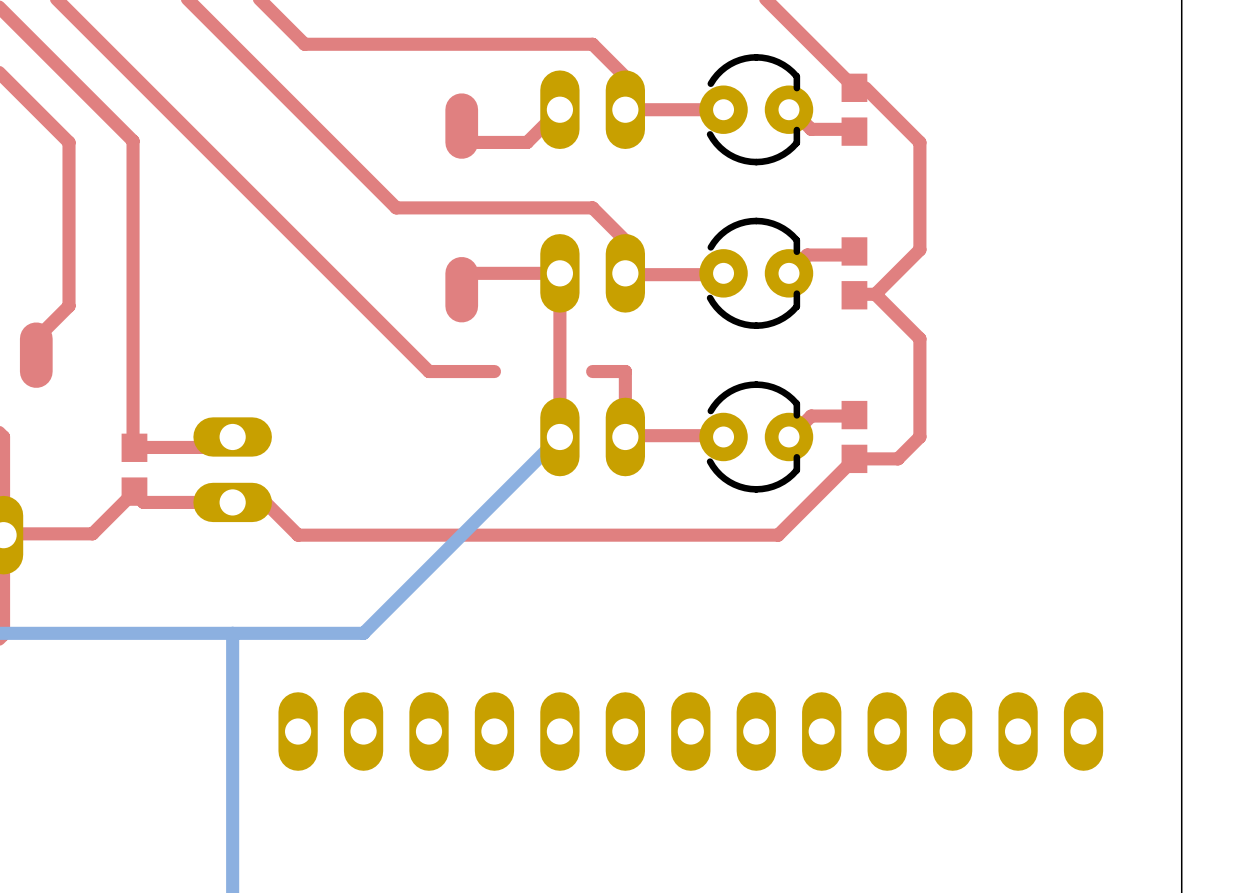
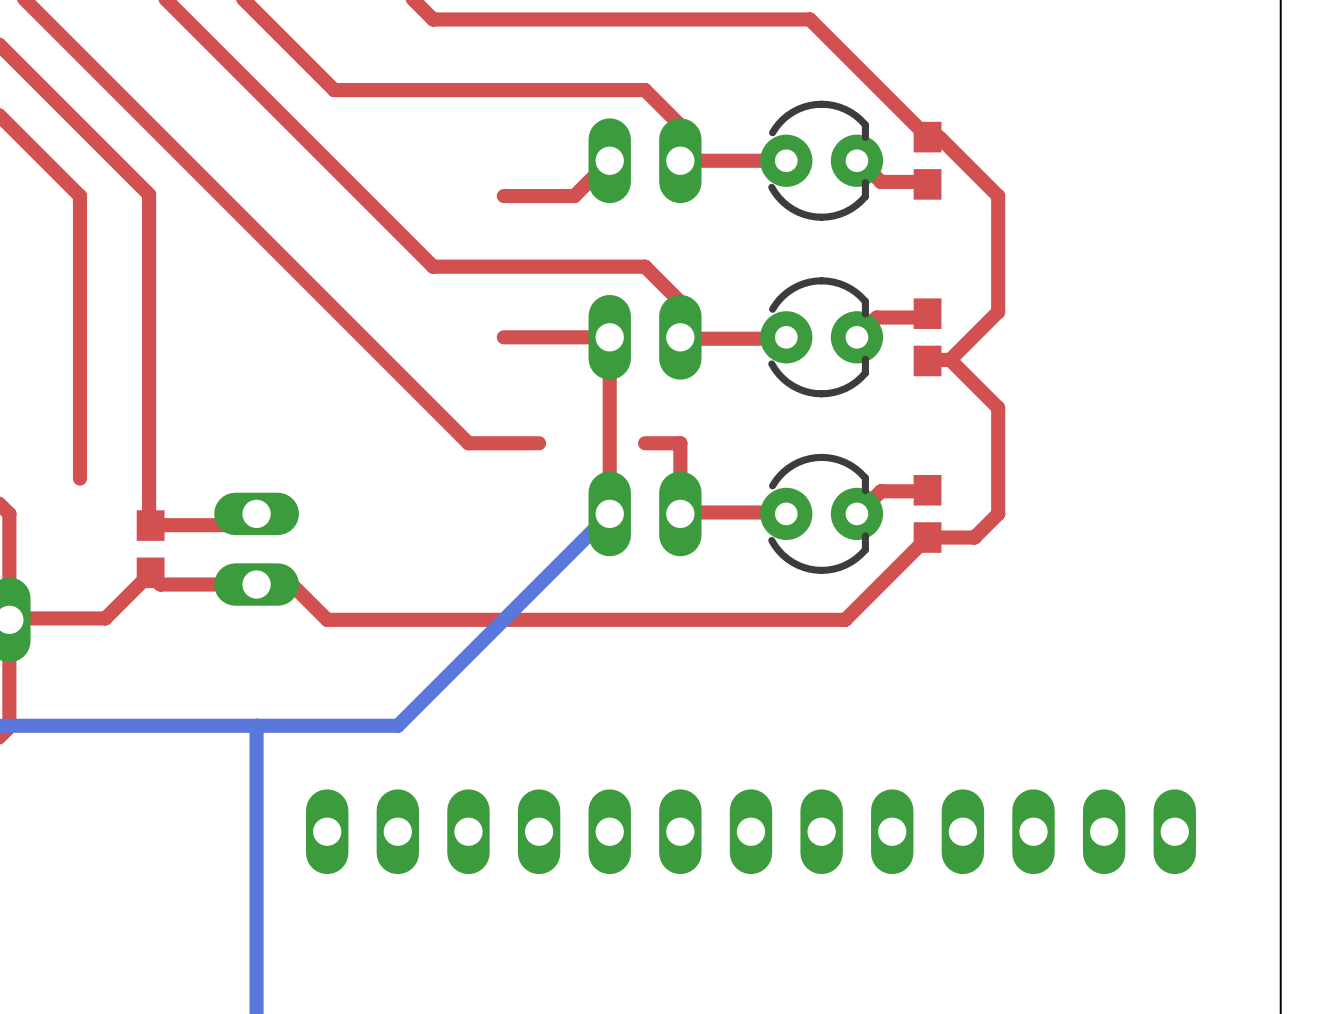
top track: (461, 109) (461, 142) -> none
top track: (461, 273) (461, 306) -> none
top track: (69, 306) (36, 338) (36, 371) -> (79, 372) (79, 478)

